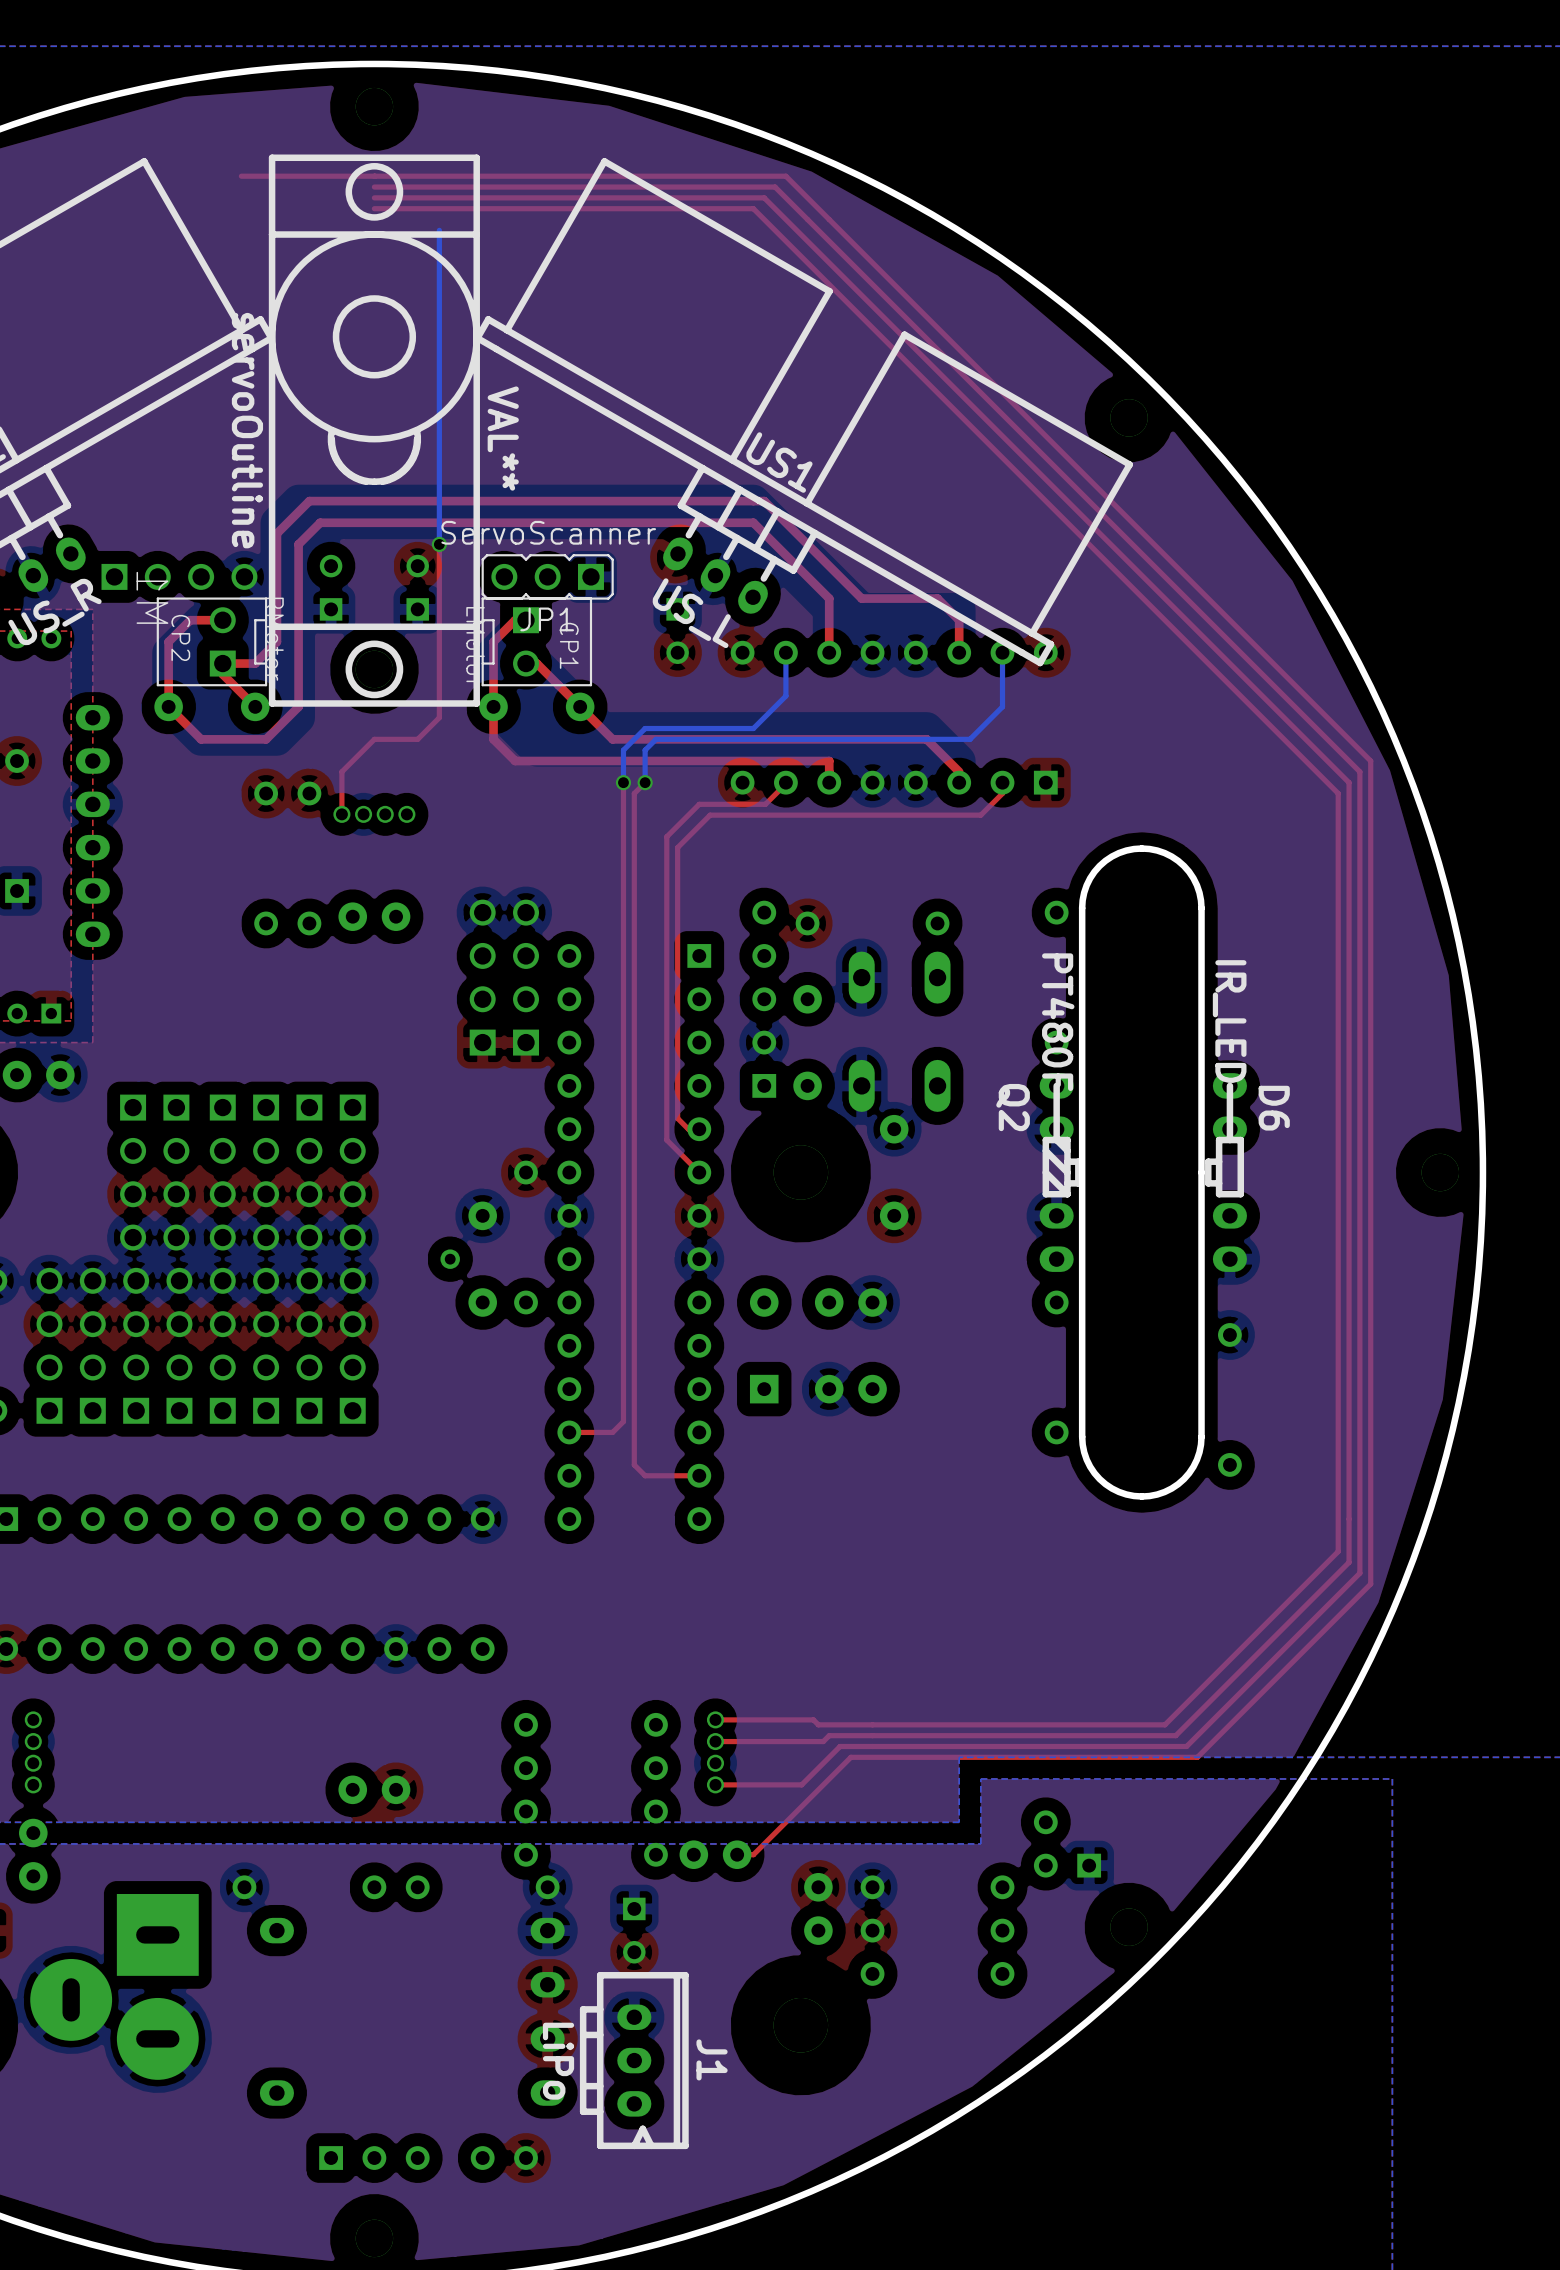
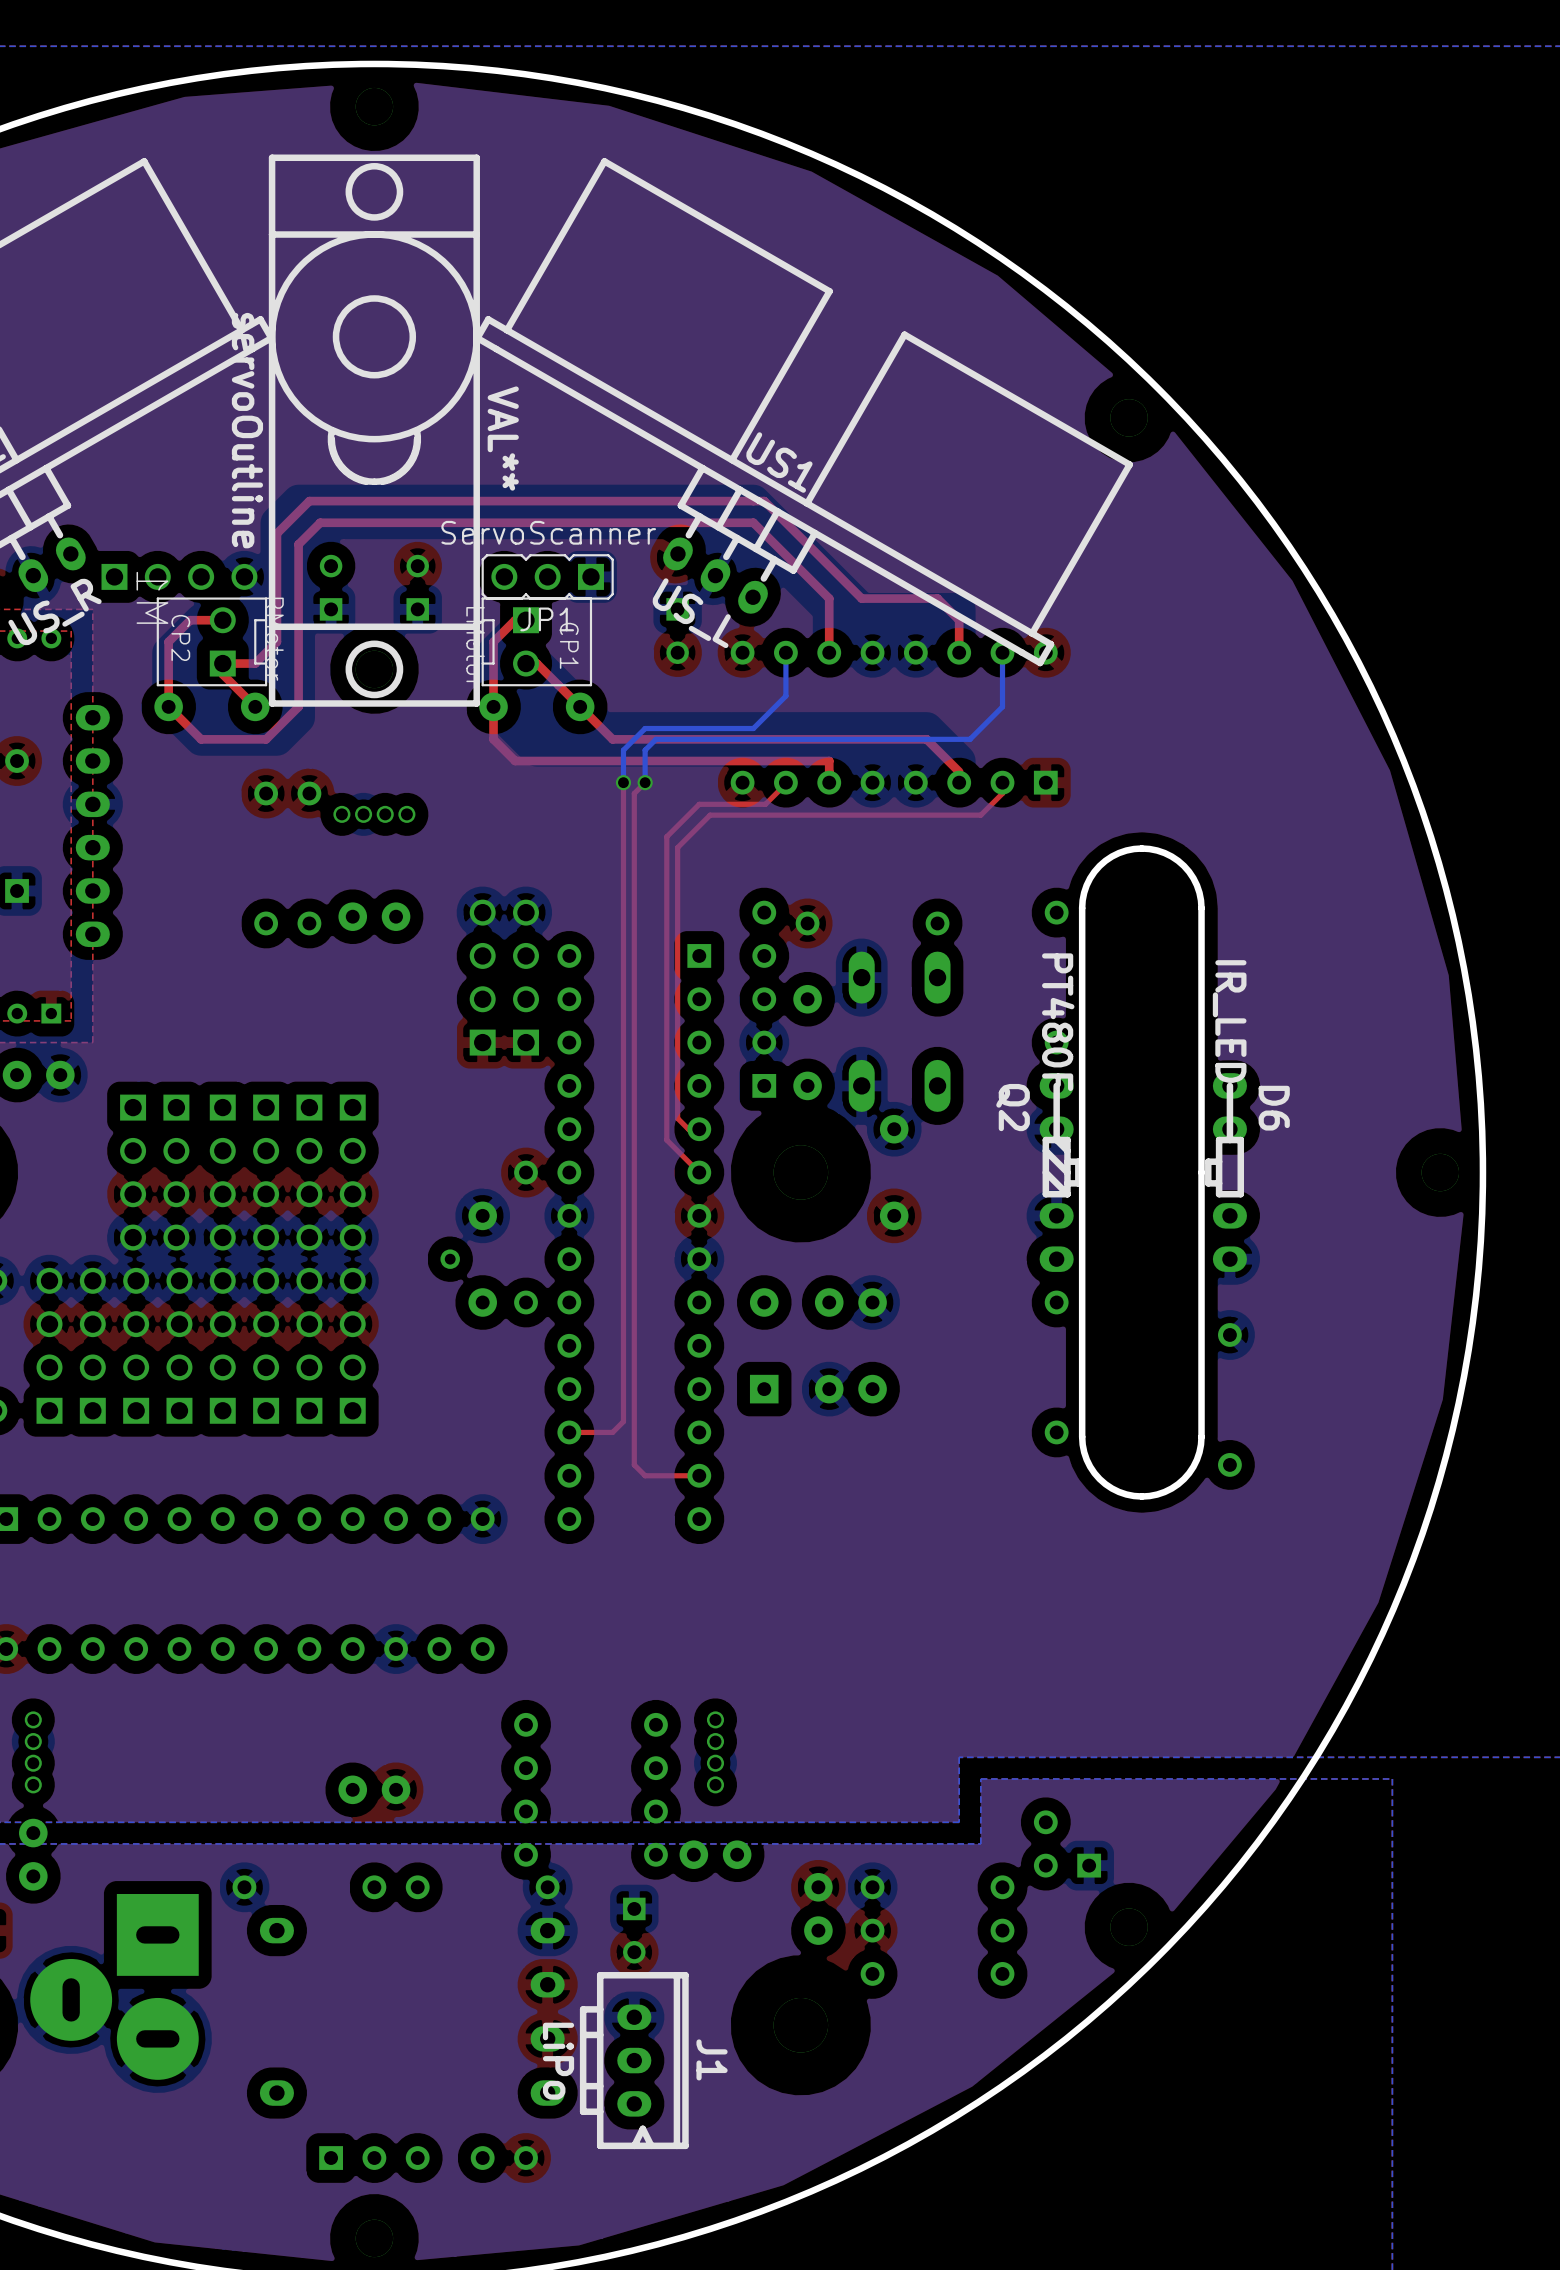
top track: (241, 176) (785, 176) (1370, 761) (1370, 1584) (1197, 1757) (850, 1757) (753, 1854) (737, 1854) -> none
top track: (374, 187) (775, 187) (1359, 771) (1359, 1573) (1186, 1746) (840, 1746) (801, 1784) (715, 1784) -> none
top track: (374, 197) (764, 197) (1349, 782) (1349, 1562) (1175, 1735) (829, 1735) (823, 1741) (715, 1741) -> none
top track: (374, 208) (753, 208) (1338, 793) (1338, 1551) (1164, 1724) (818, 1724) (813, 1719) (715, 1719) -> none
bottom track: (439, 230) (439, 544) -> none
top track: (439, 544) (439, 717) (417, 739) (374, 739) (341, 771) (341, 814) -> none
via: (439, 544) -> none

